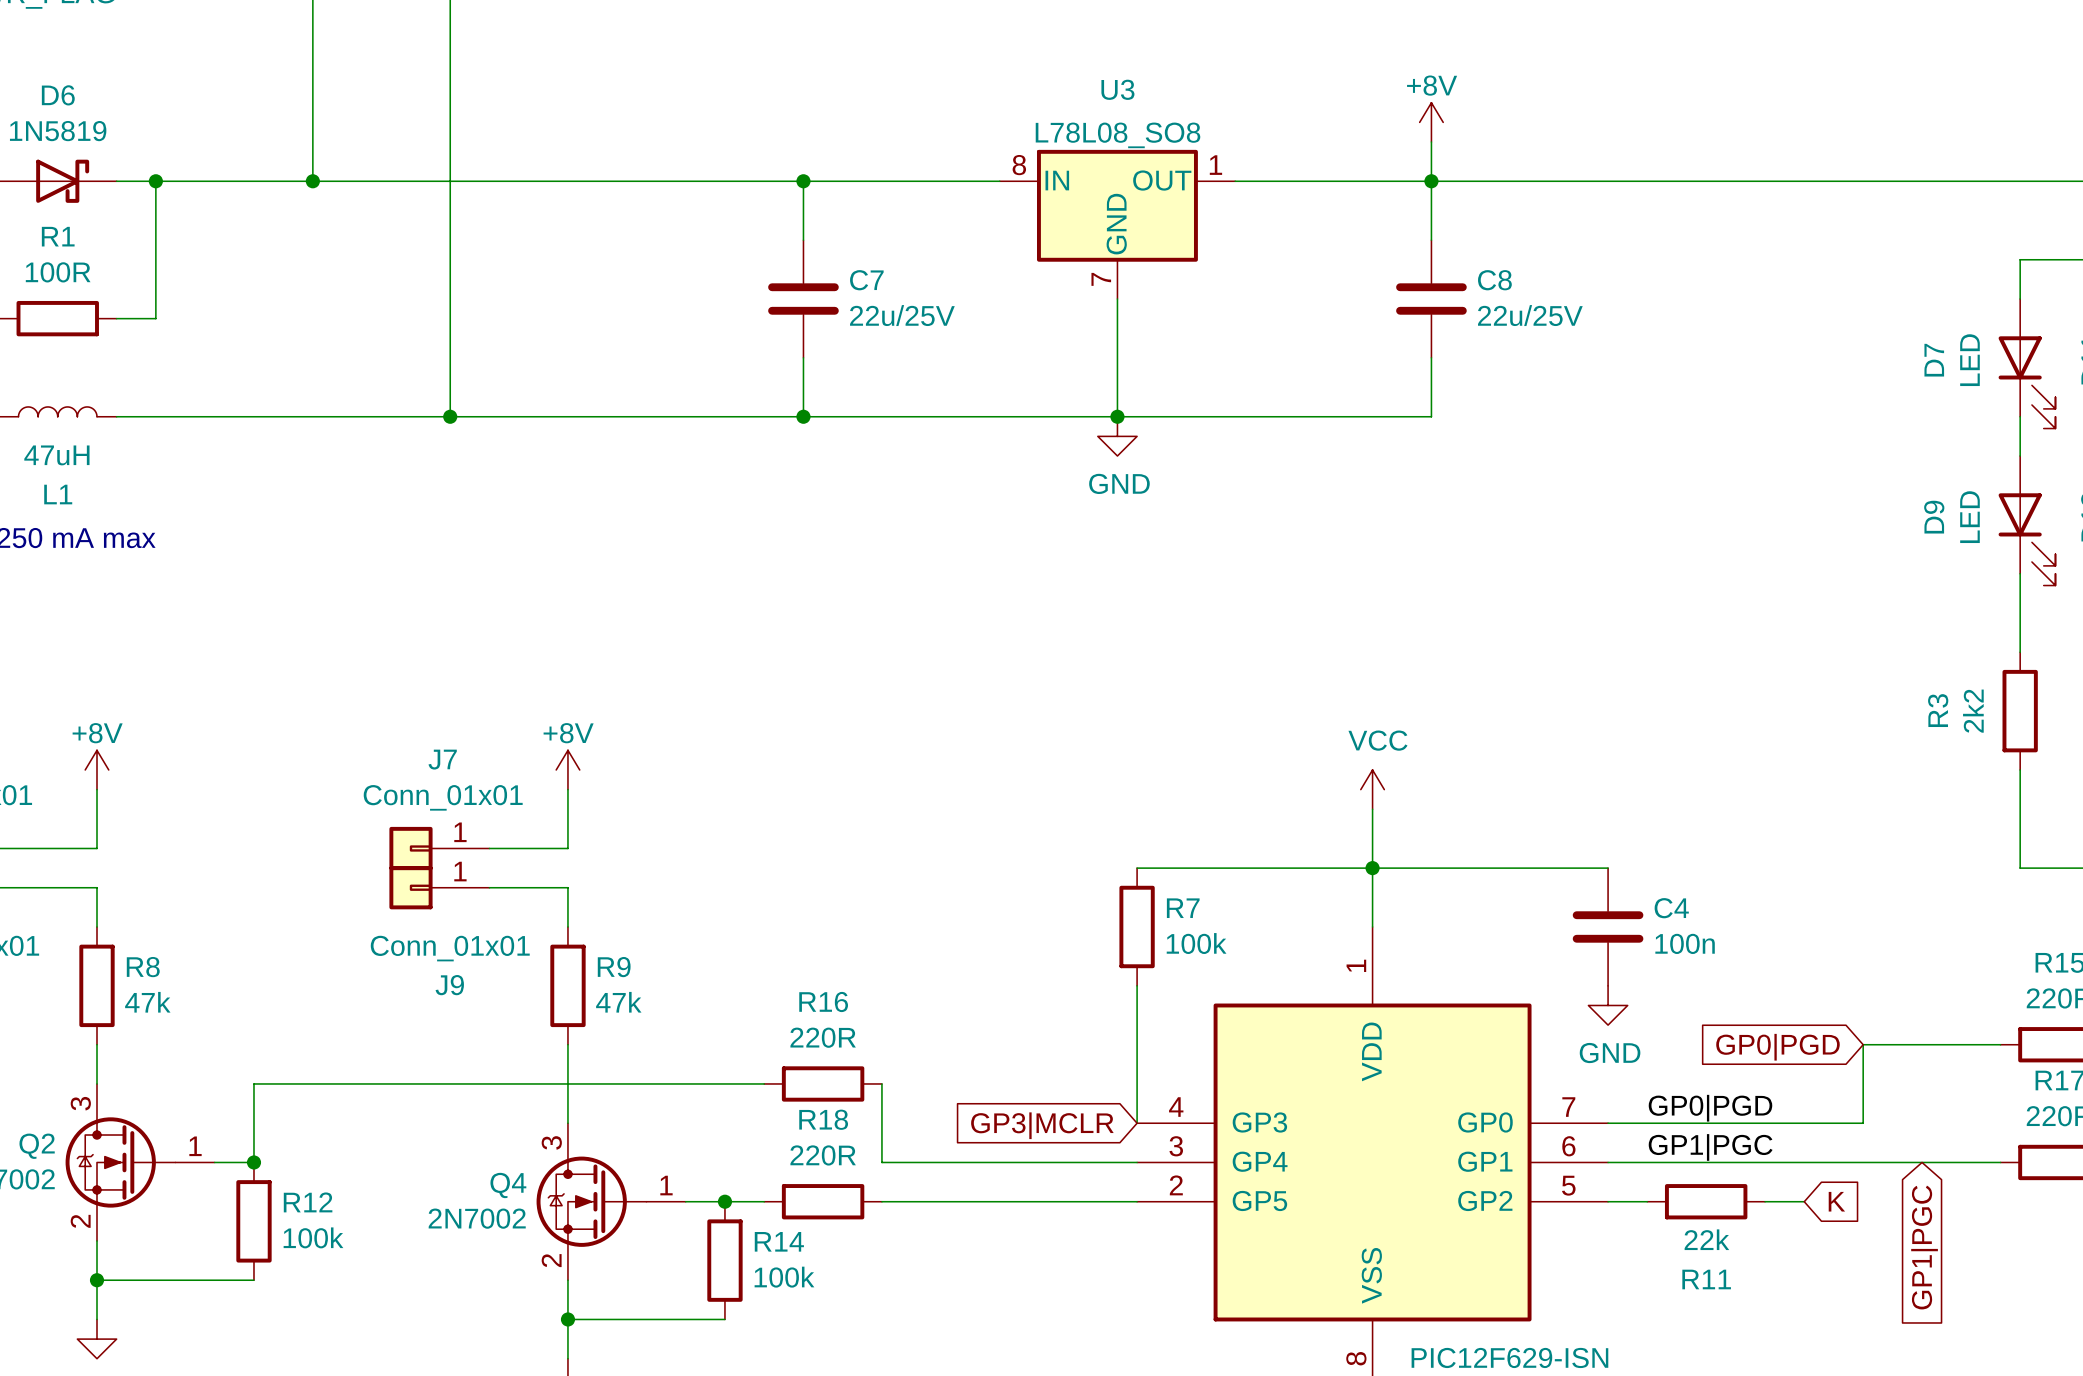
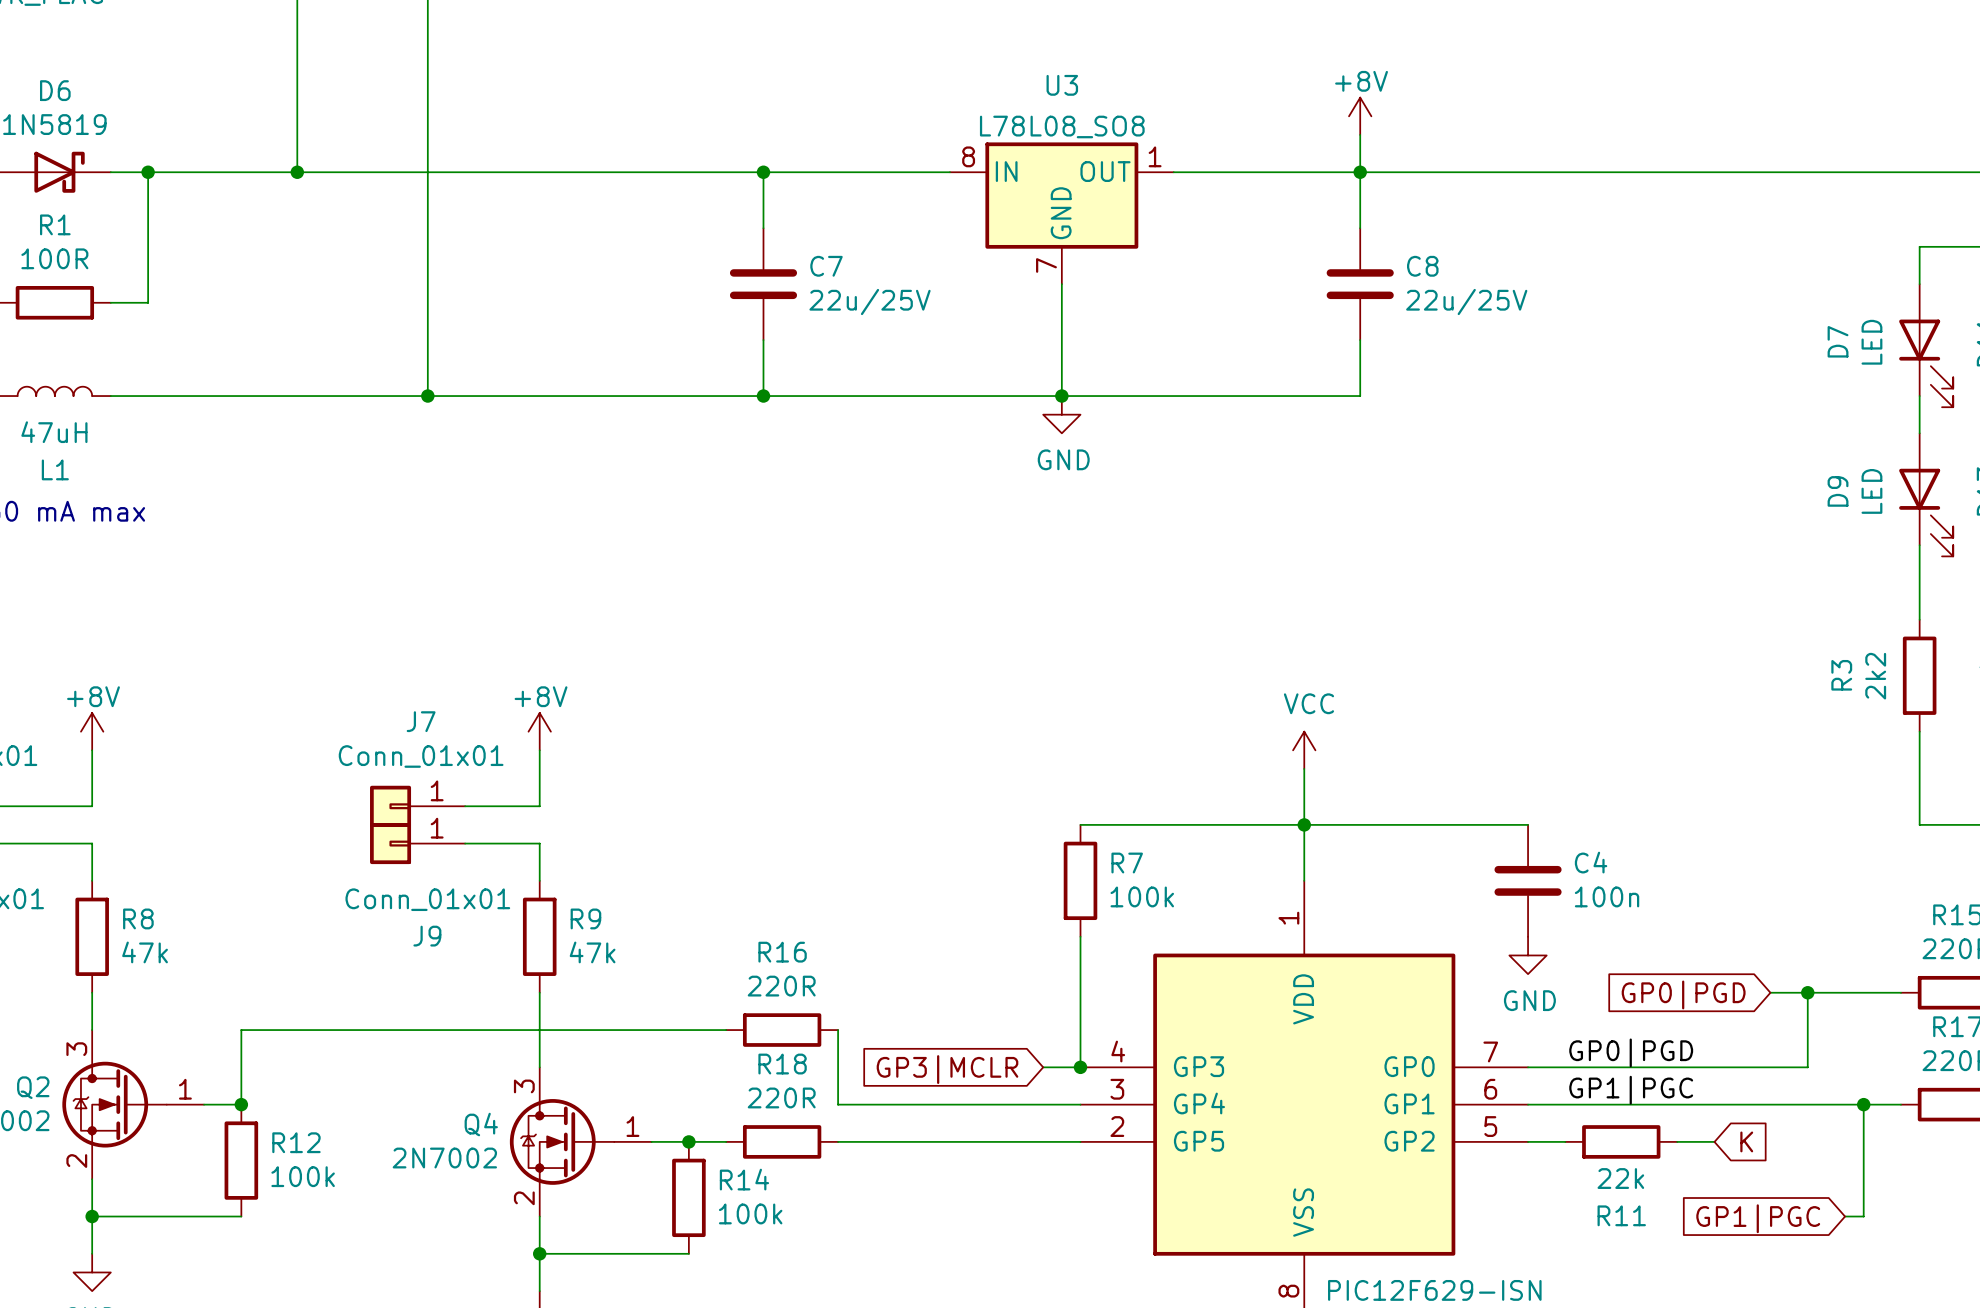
wire: (1863, 1044) (1863, 1123) -> (1807, 992) (1807, 1067) (1770, 1067)
junction: none -> (1807, 992)
wire: none -> (1043, 1067) (1080, 1067)
junction: none -> (1080, 1067)
global label position: GP3|MCLR (1042, 1125) -> GP3|MCLR (947, 1069)
wire: none -> (1863, 1104) (1863, 1216) (1845, 1216)
junction: none -> (1863, 1104)
global label rotation: 0° (1924, 1247) -> 90° clockwise (1758, 1218)

